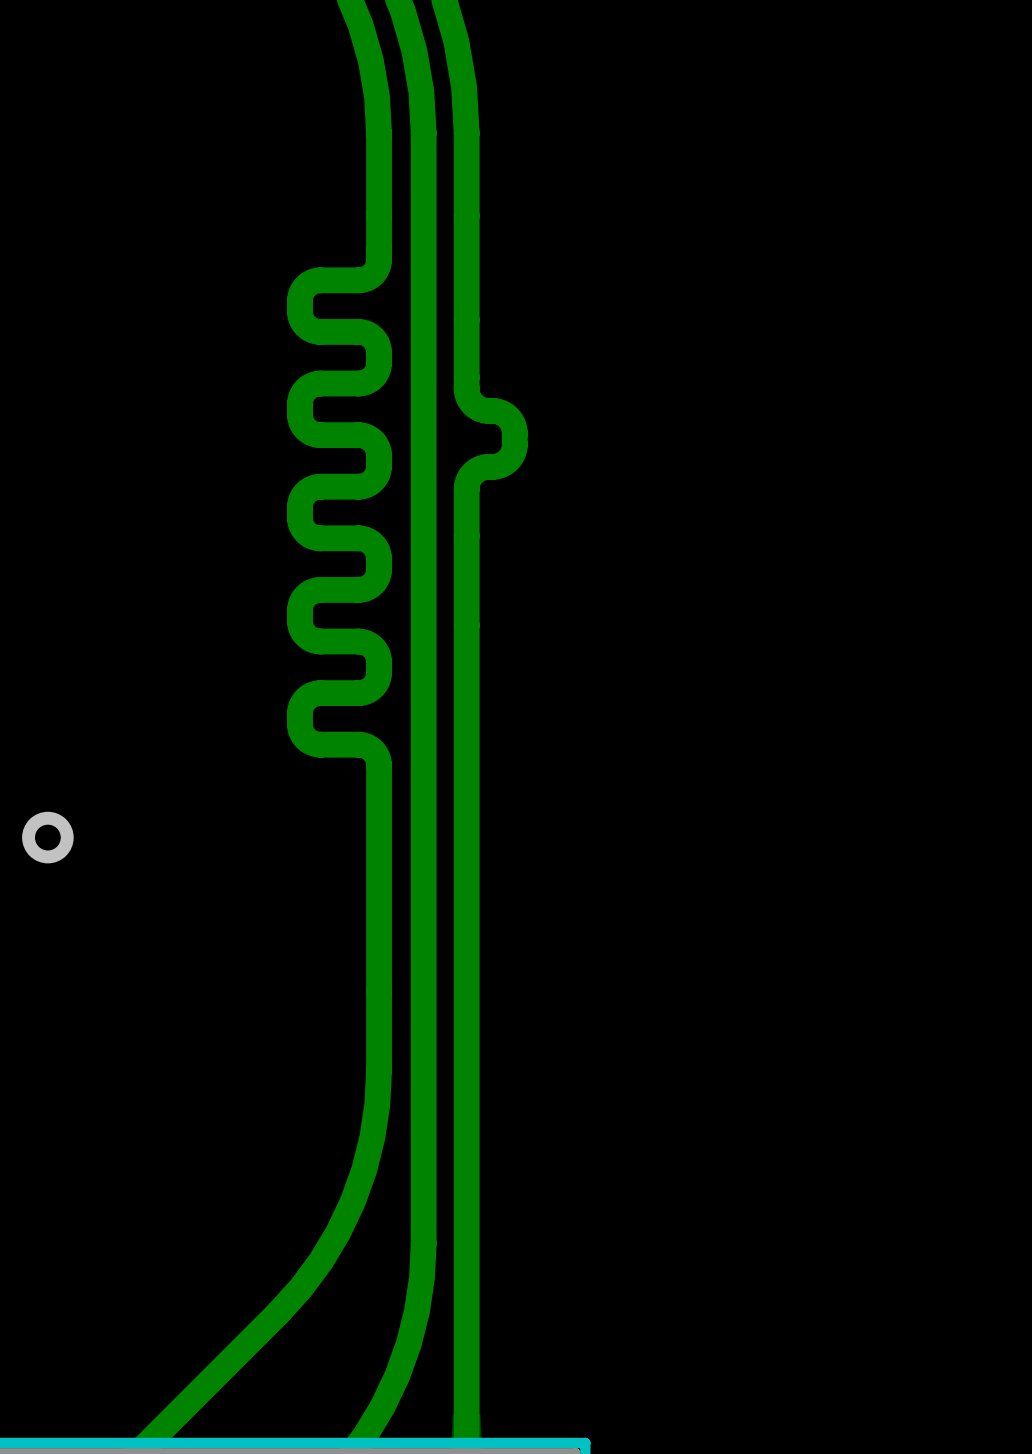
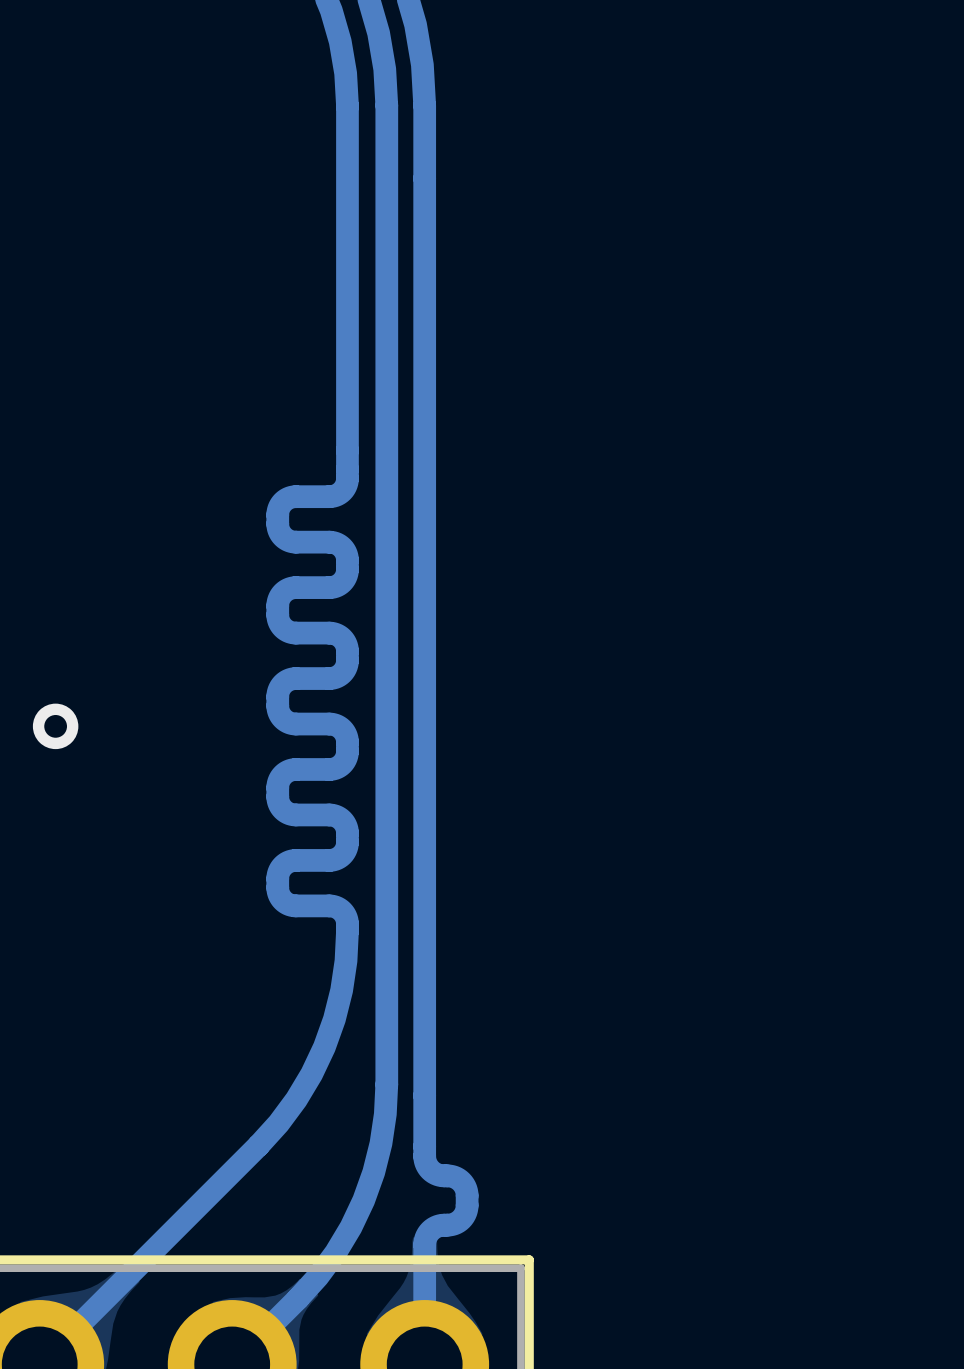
track: (379, 259) (375, 270) (367, 278) (360, 280) (313, 281) (304, 288) (299, 300) (301, 318) (309, 328) (318, 331) (365, 333) (375, 341) (379, 352) -> (347, 217) (347, 298)
track: (379, 362) (375, 373) (367, 381) (360, 383) (313, 384) (303, 393) (299, 404) (301, 421) (309, 431) (318, 435) (365, 436) (375, 444) (379, 455) -> (347, 308) (347, 389)
track: (466, 388) (470, 400) (477, 407) (499, 412) (508, 417) (513, 425) (514, 433) (514, 449) (509, 458) (499, 465) (484, 467) (475, 471) (468, 479) (466, 489) -> (424, 330) (424, 419)
track: (379, 466) (375, 477) (367, 484) (360, 486) (313, 487) (304, 494) (299, 507) (301, 524) (309, 535) (318, 538) (363, 538) (373, 544) (378, 554) (378, 573) (371, 585) (360, 589) (313, 591) (303, 599) (299, 610) (301, 627) (305, 635) (311, 639) (320, 641) (360, 641) (373, 647) (378, 659) (377, 681) (371, 688) (363, 692) (318, 693) (309, 696) (301, 706) (299, 724) (304, 736) (313, 743) (363, 745) (371, 749) (375, 754) (379, 765) (379, 855) -> (347, 398) (347, 478) (344, 488) (333, 496) (289, 497) (280, 505) (277, 514) (278, 529) (286, 539) (293, 542) (335, 543) (343, 548) (347, 560) (346, 575) (338, 584) (331, 587) (291, 588) (284, 591) (279, 597) (277, 616) (283, 627) (293, 632) (337, 634) (346, 645) (347, 660) (343, 671) (335, 677) (293, 678) (284, 682) (278, 692) (278, 711) (284, 720) (291, 723) (337, 725) (344, 732) (347, 742)
track: (379, 865) (379, 958) -> (347, 751) (344, 760) (337, 767) (289, 770) (280, 778) (277, 787) (278, 802) (286, 812) (293, 814) (335, 815) (344, 823) (347, 833)
track: (379, 969) (379, 1061) -> (347, 842) (344, 851) (337, 858) (289, 861) (280, 868) (277, 878) (278, 893) (286, 903) (293, 905) (335, 906) (344, 914) (347, 924)
track: (466, 1325) (466, 1425) -> (424, 1156) (426, 1164) (433, 1172) (453, 1176) (461, 1181) (467, 1195) (466, 1209) (462, 1217) (453, 1224) (440, 1225) (432, 1229) (426, 1236) (424, 1244)

